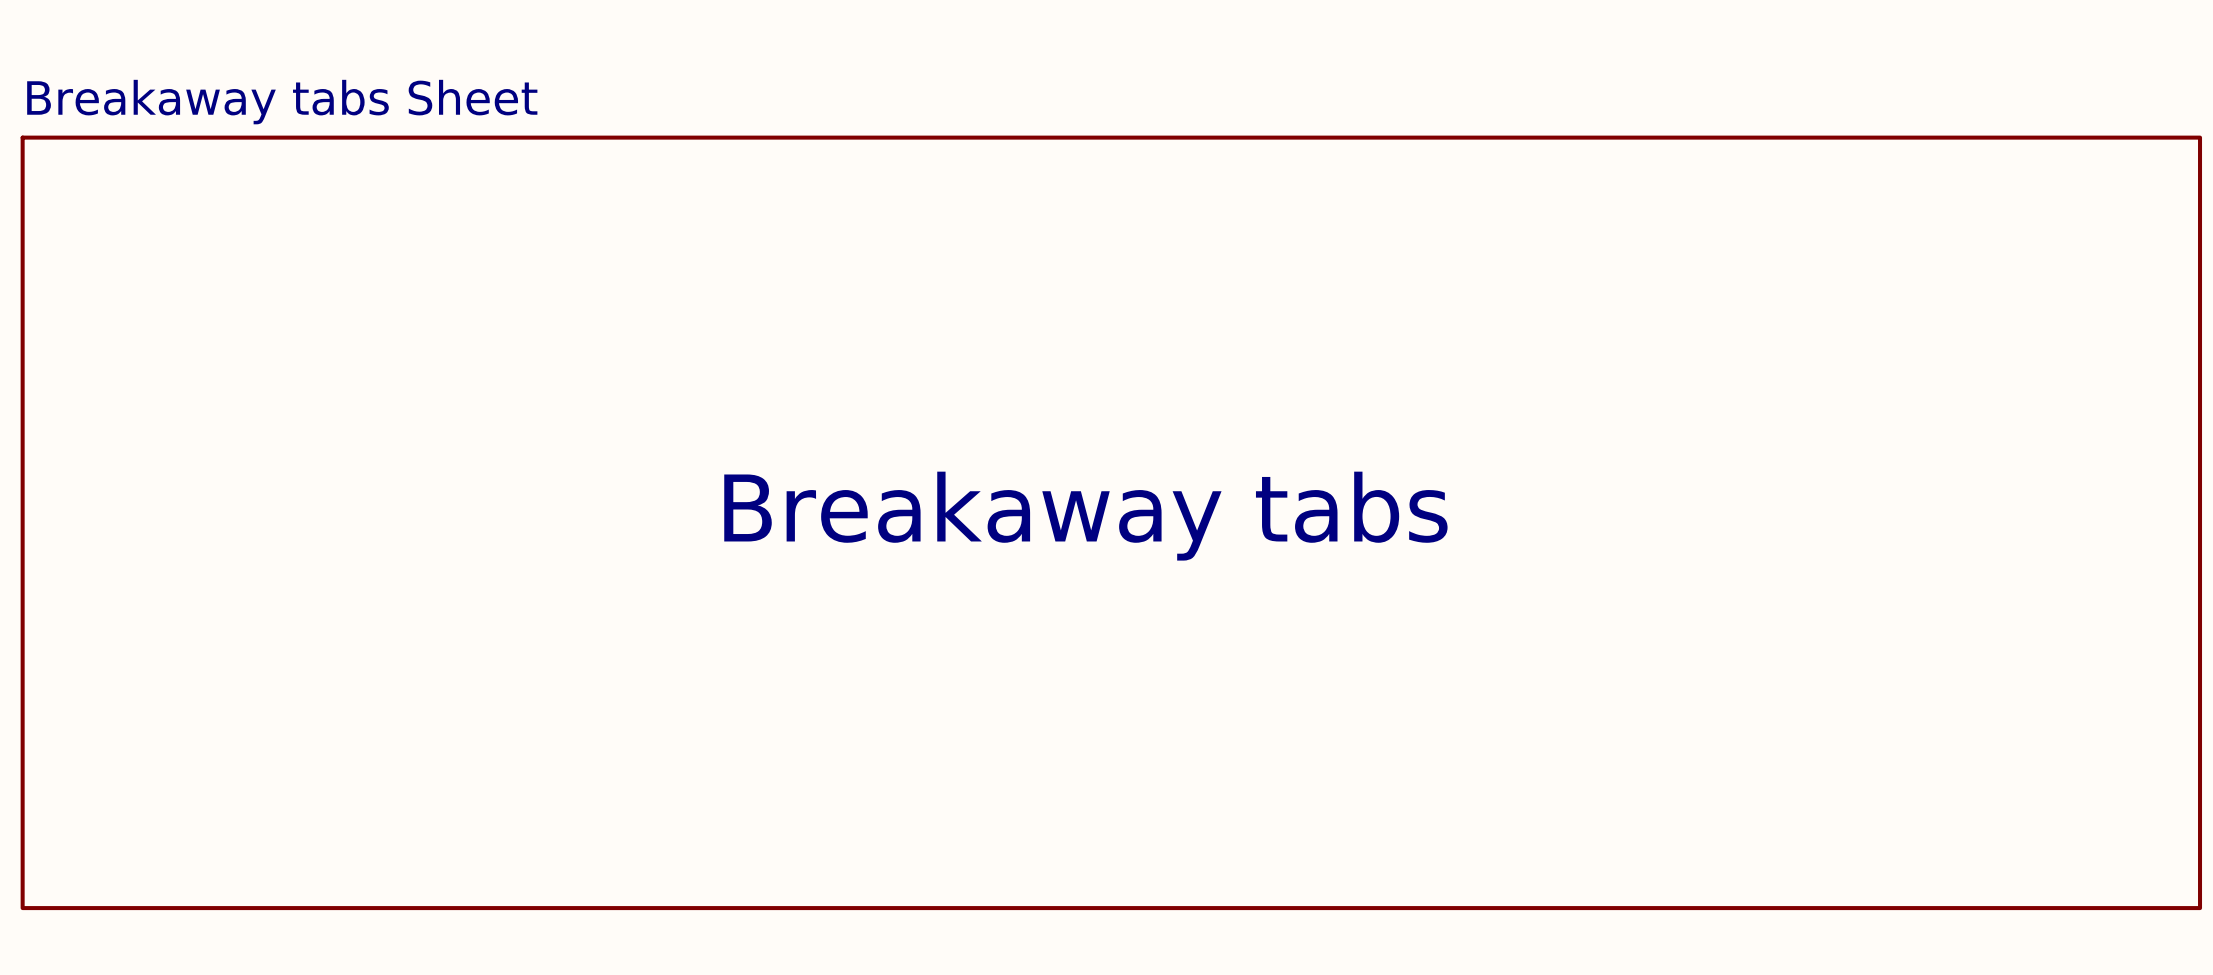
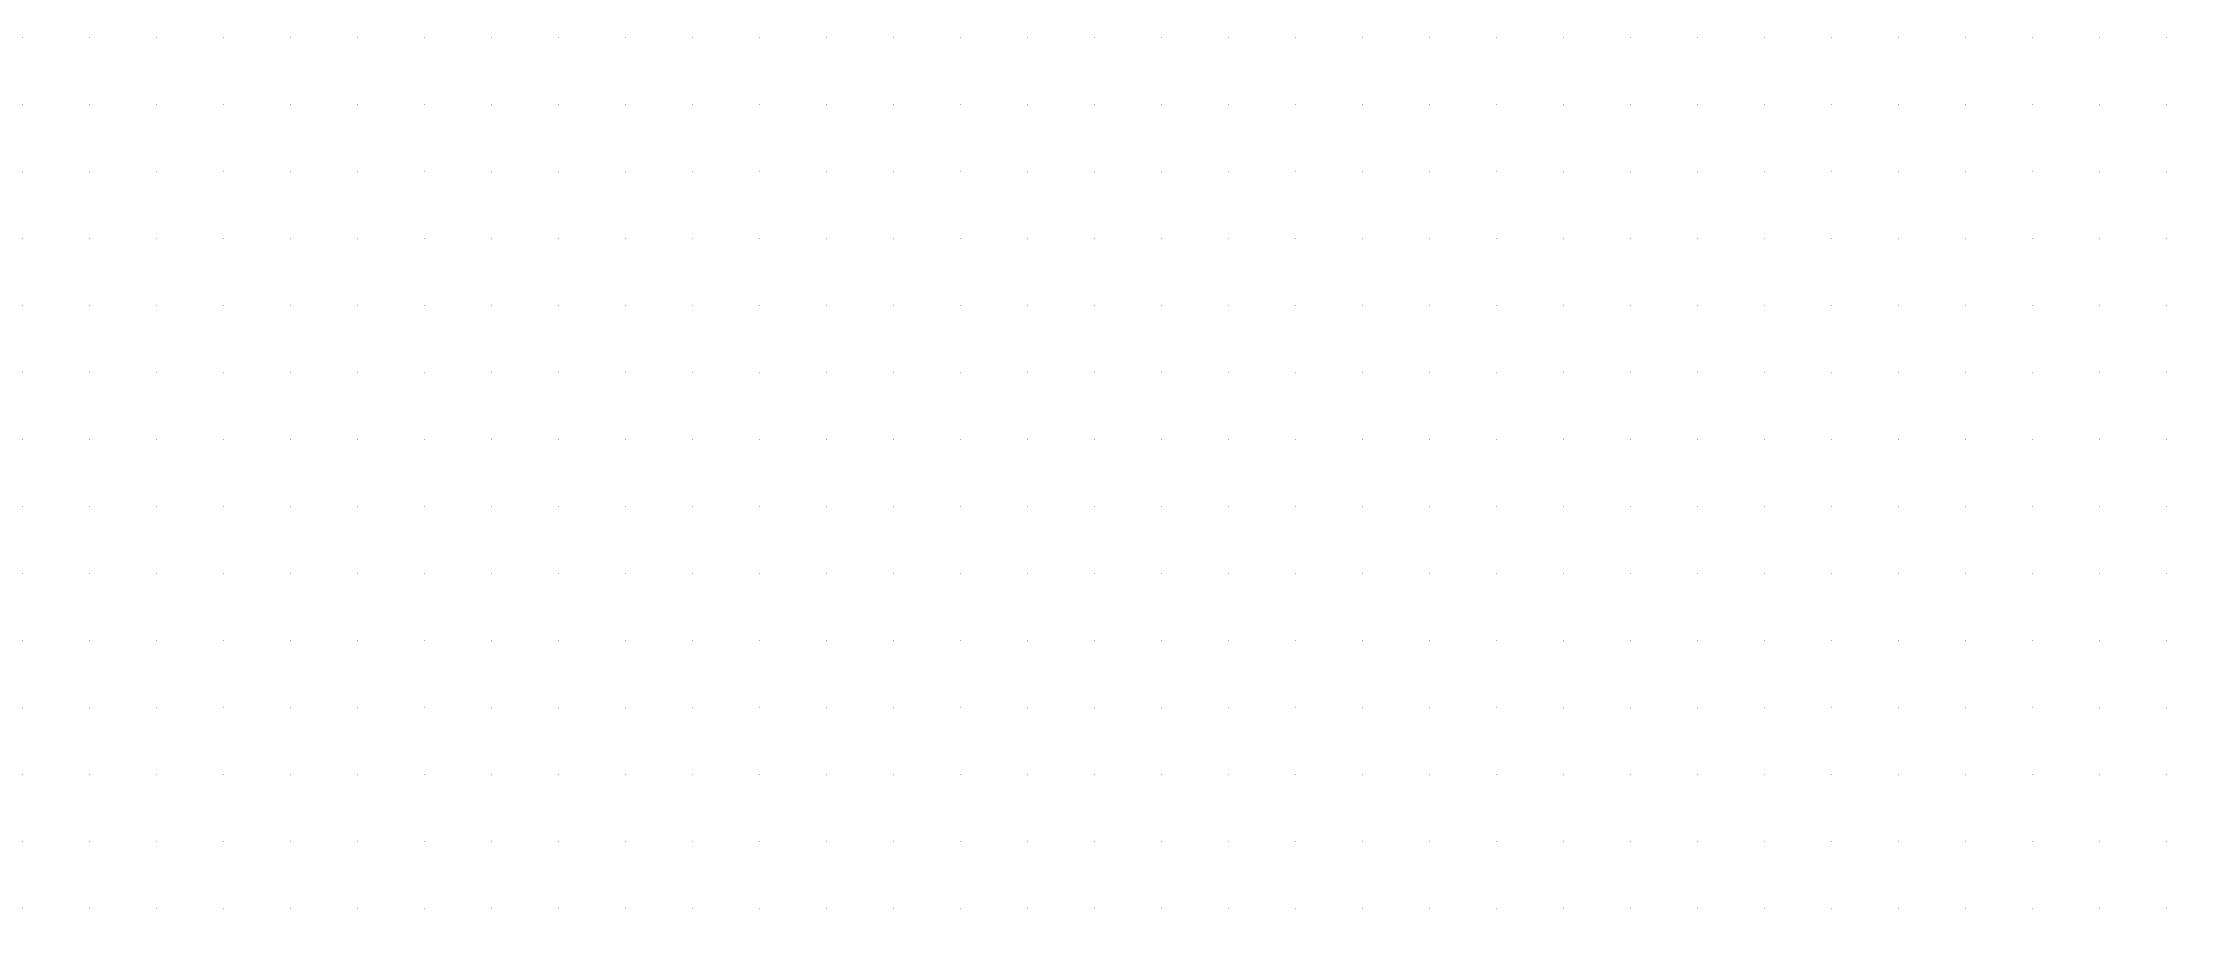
text: Breakaway tabs (1085, 516) -> none
sheet Breakaway tabs Sheet: (1111, 522) -> none

